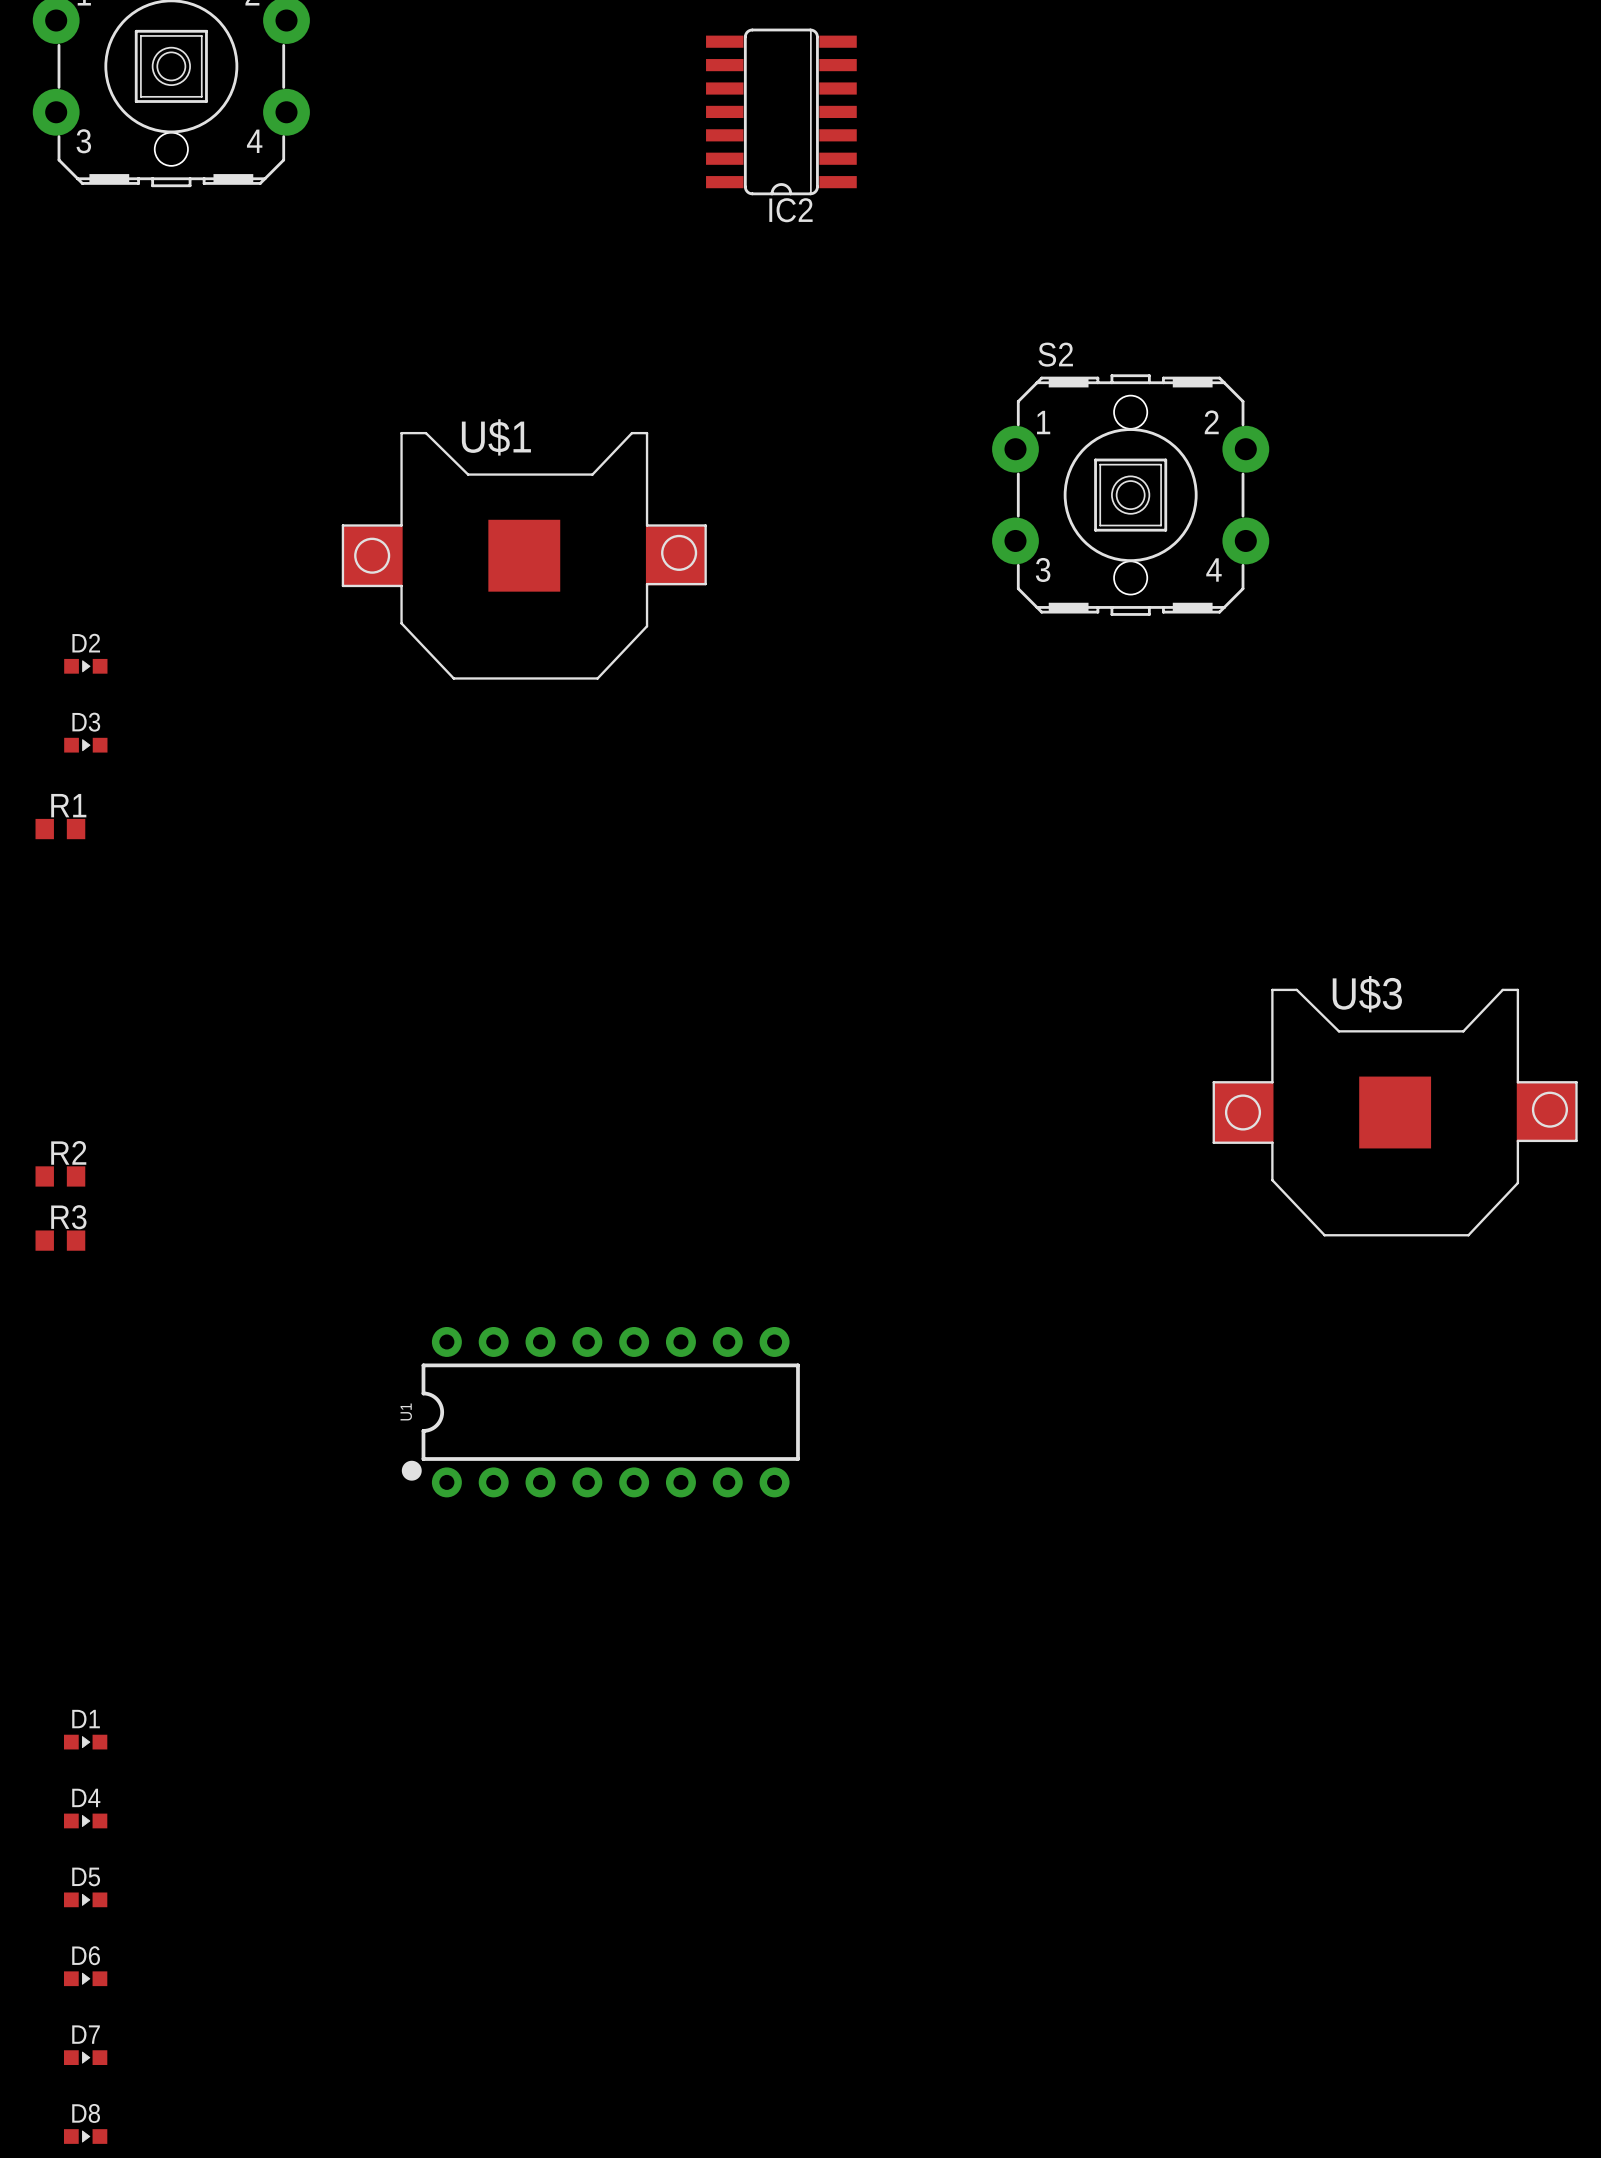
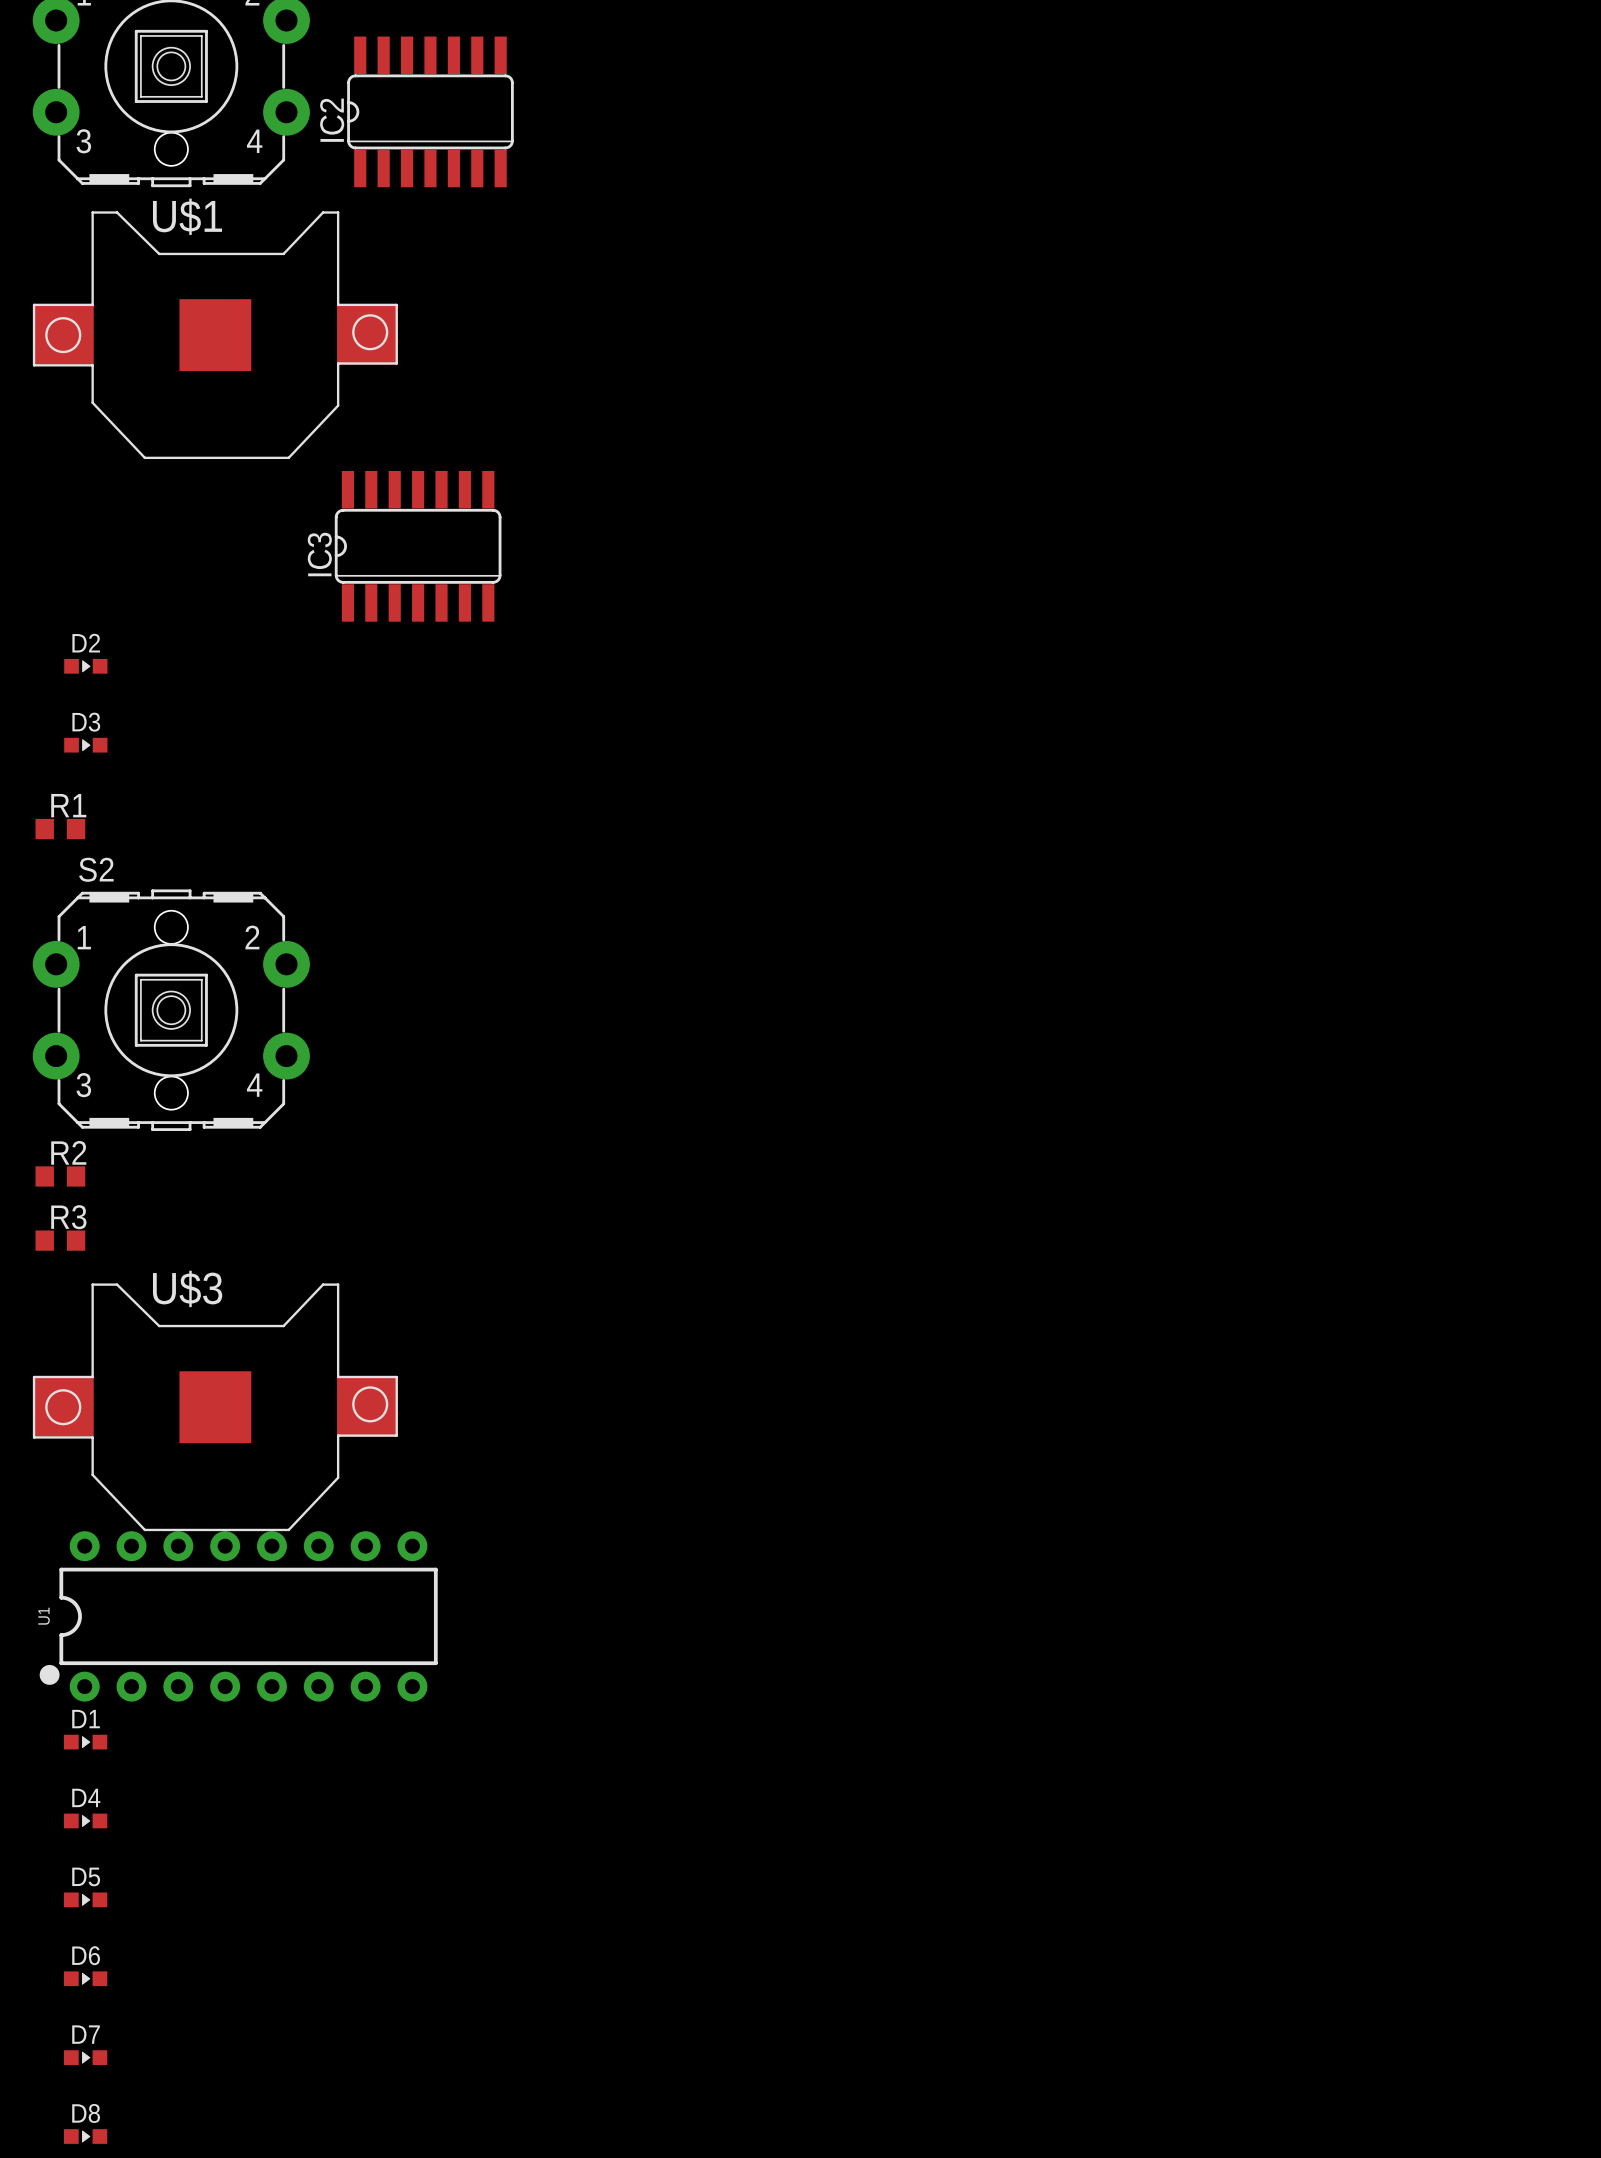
IC2 rotation: 0° (781, 111) -> 90° clockwise (430, 111)
IC2 position: (781, 111) -> (430, 111)
S2 position: (1130, 495) -> (171, 1010)
IC3: none -> (418, 546)
U$1 position: (524, 555) -> (215, 335)
U$3 position: (1395, 1112) -> (215, 1407)
U1 position: (600, 1412) -> (238, 1616)

